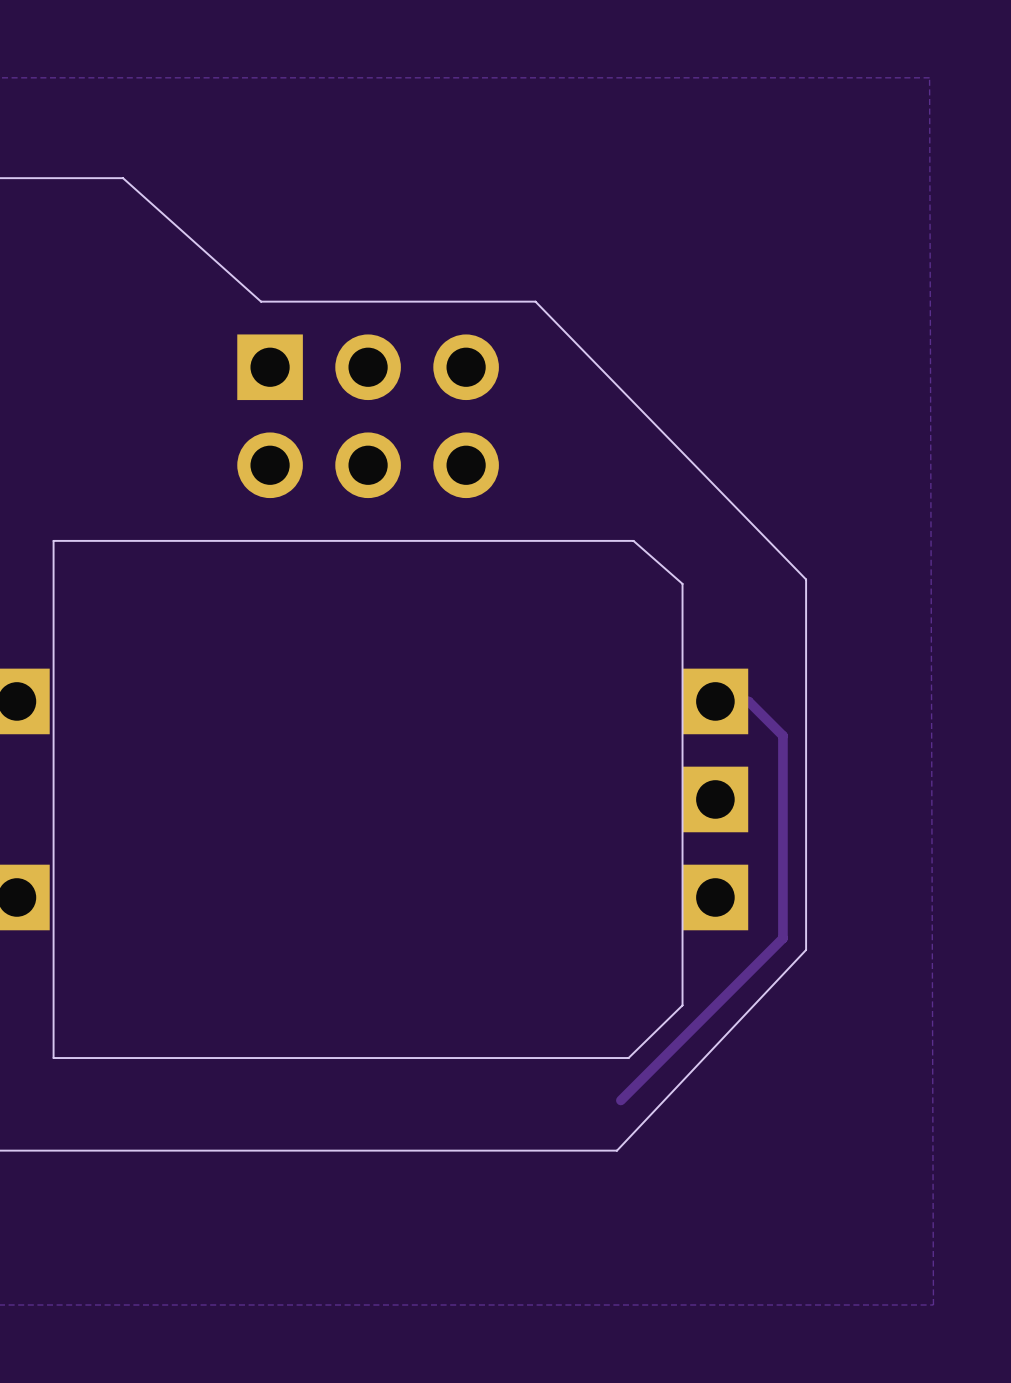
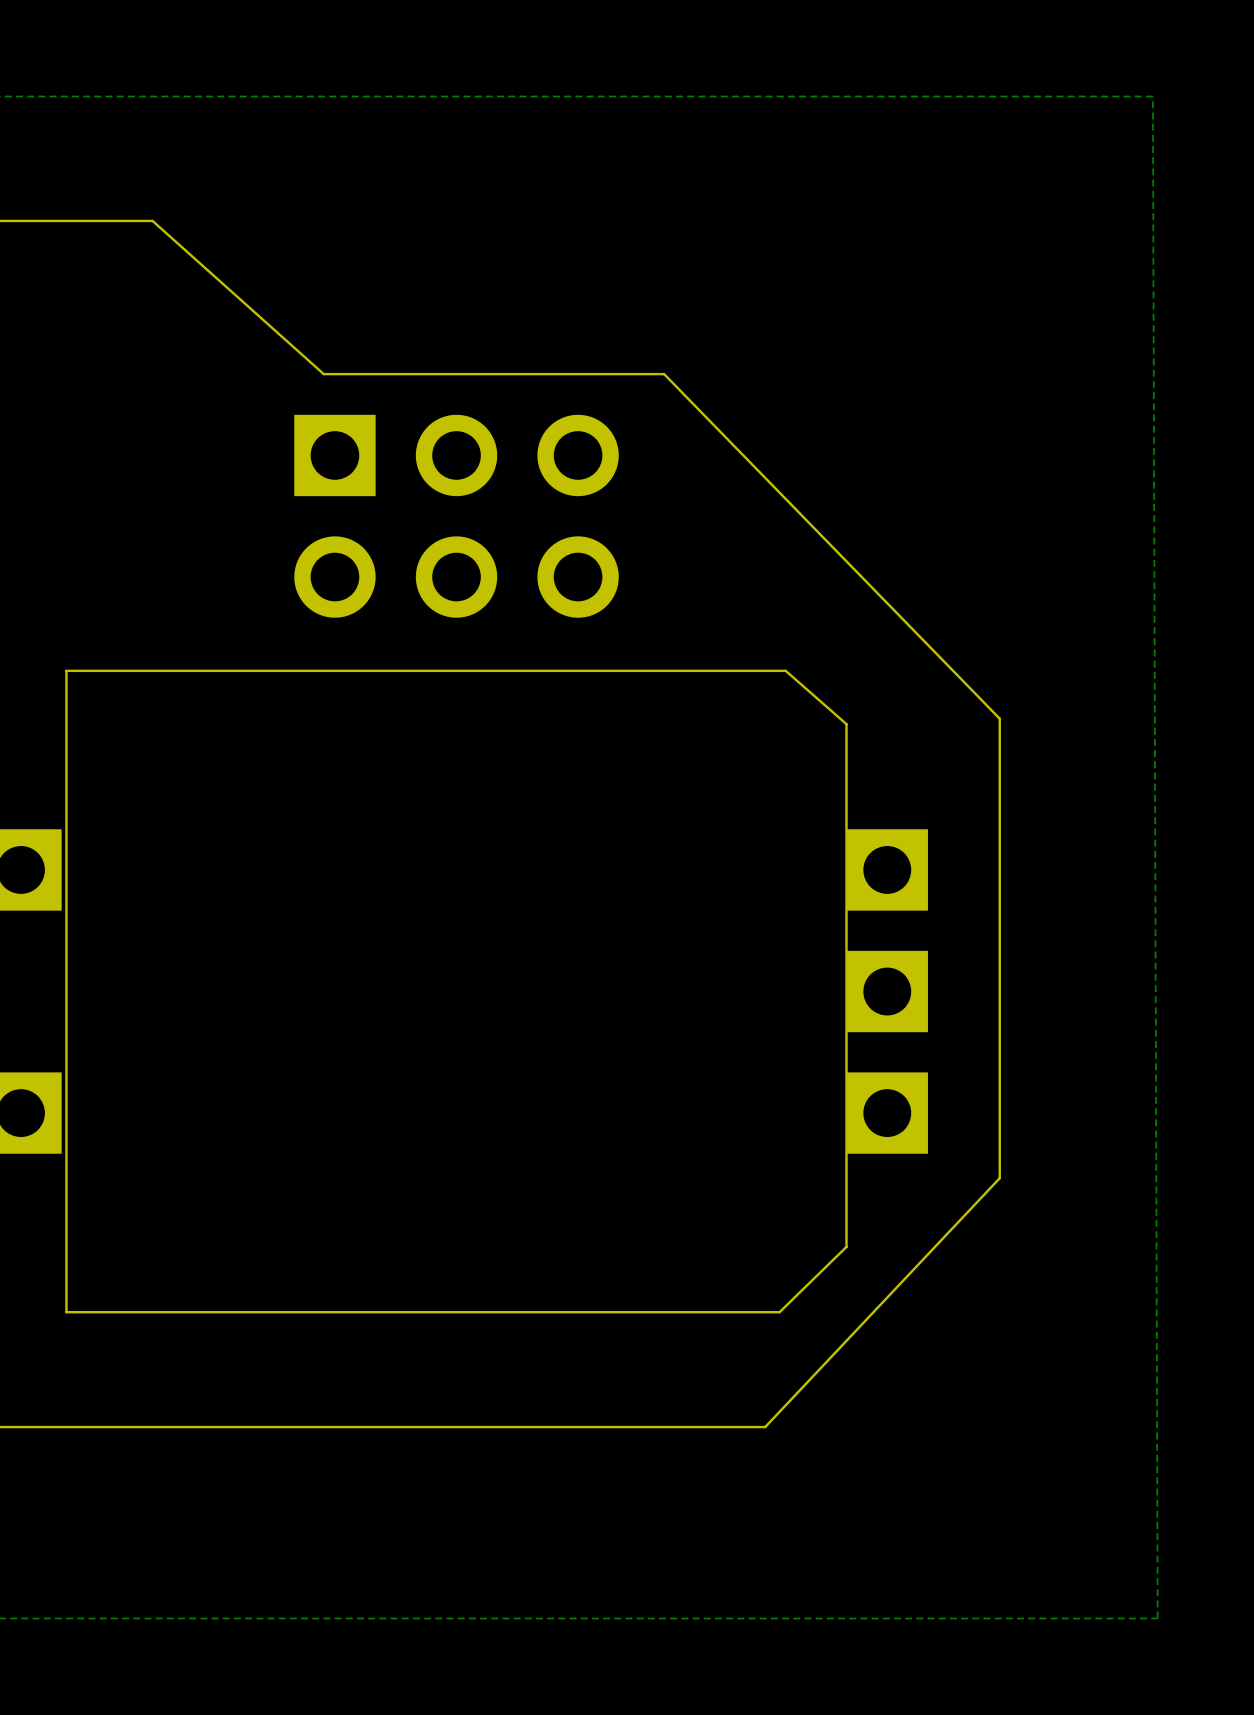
track: (715, 701) (748, 701) (782, 735) (782, 938) (620, 1100) -> none

